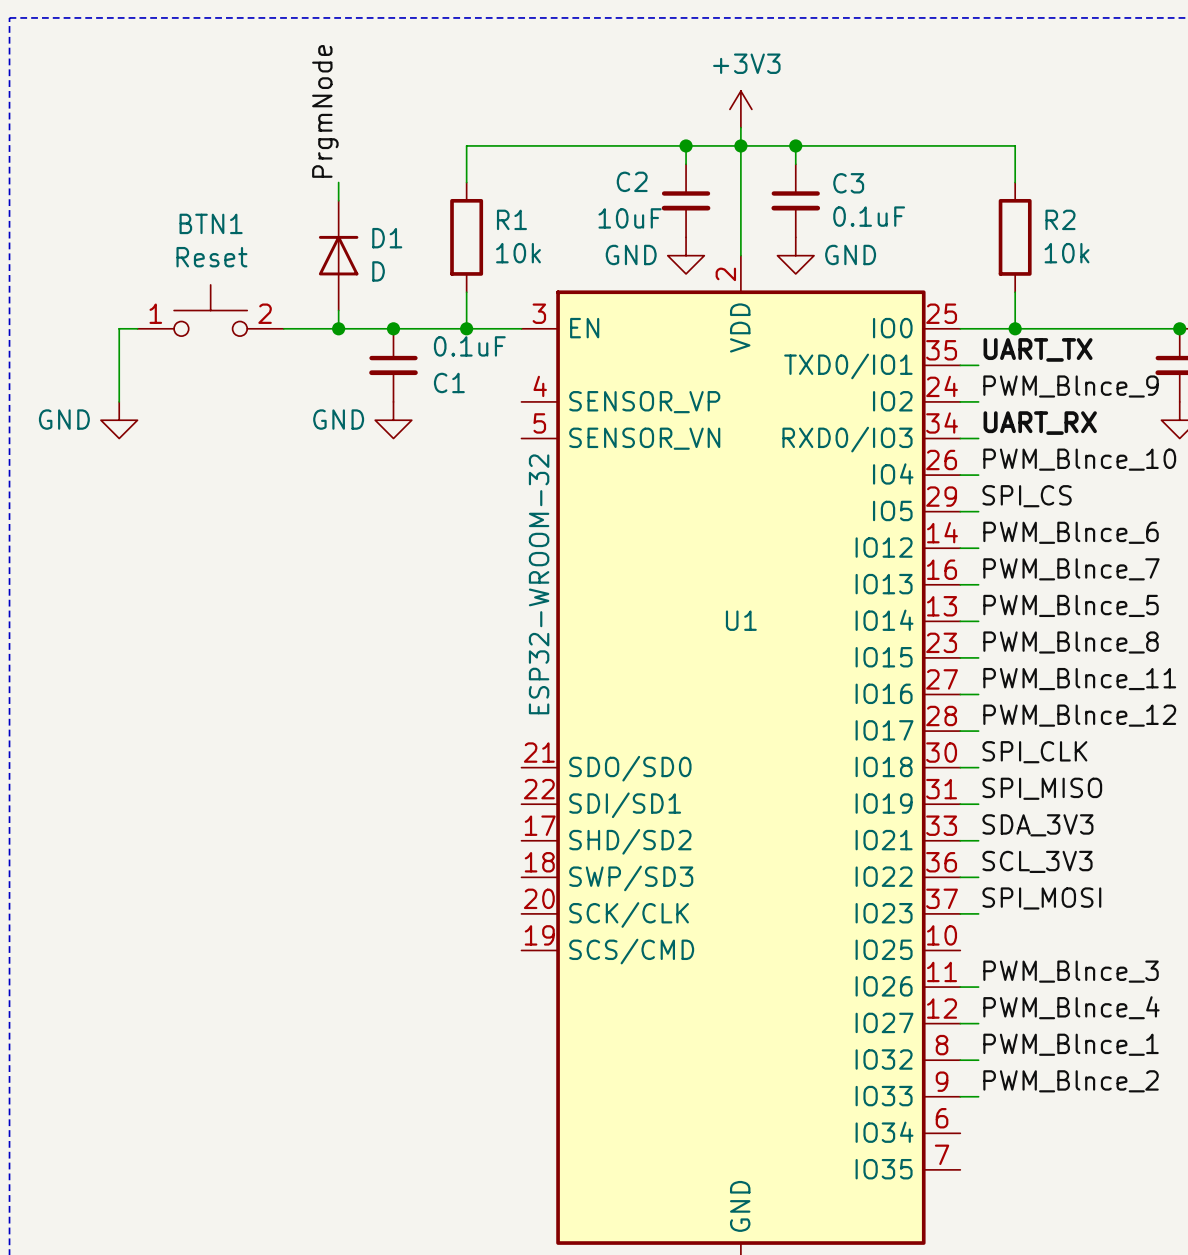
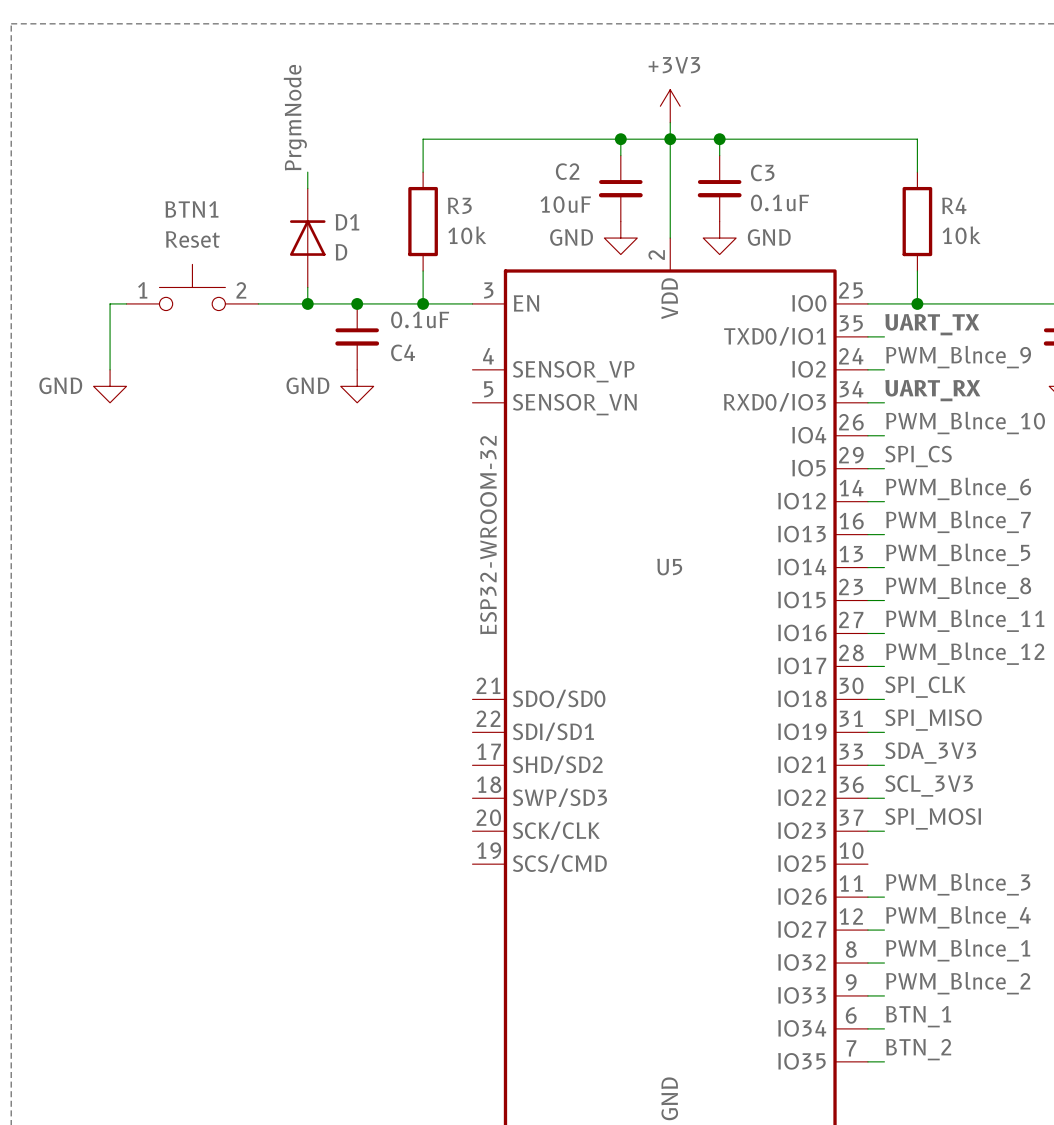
R1 name: R1 (511, 219) -> R3 (459, 205)
R2 name: R2 (1060, 219) -> R4 (954, 205)
C1 name: C1 (449, 382) -> C4 (403, 352)
U1 name: U1 (741, 620) -> U5 (669, 567)
label: none -> BTN_1 (918, 1016)
wire: none -> (867, 1028) (884, 1028)
label: none -> BTN_2 (918, 1049)
wire: none -> (867, 1061) (884, 1061)

